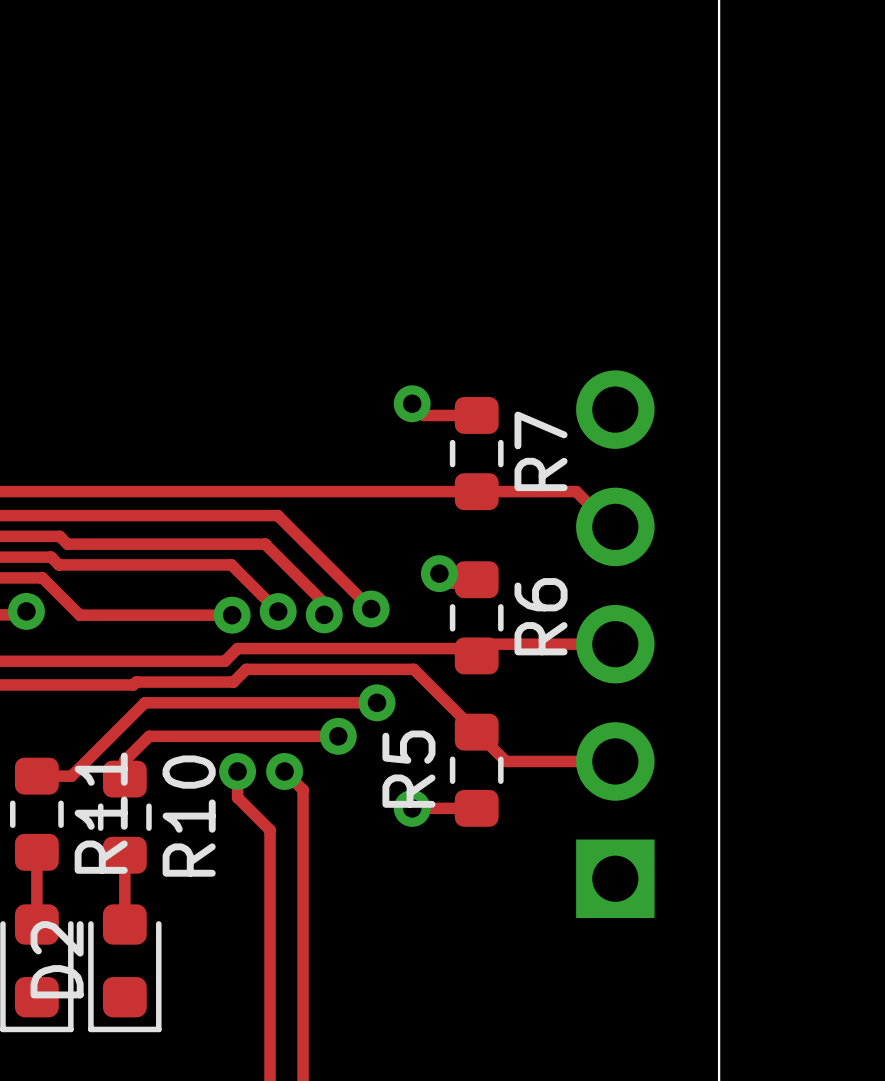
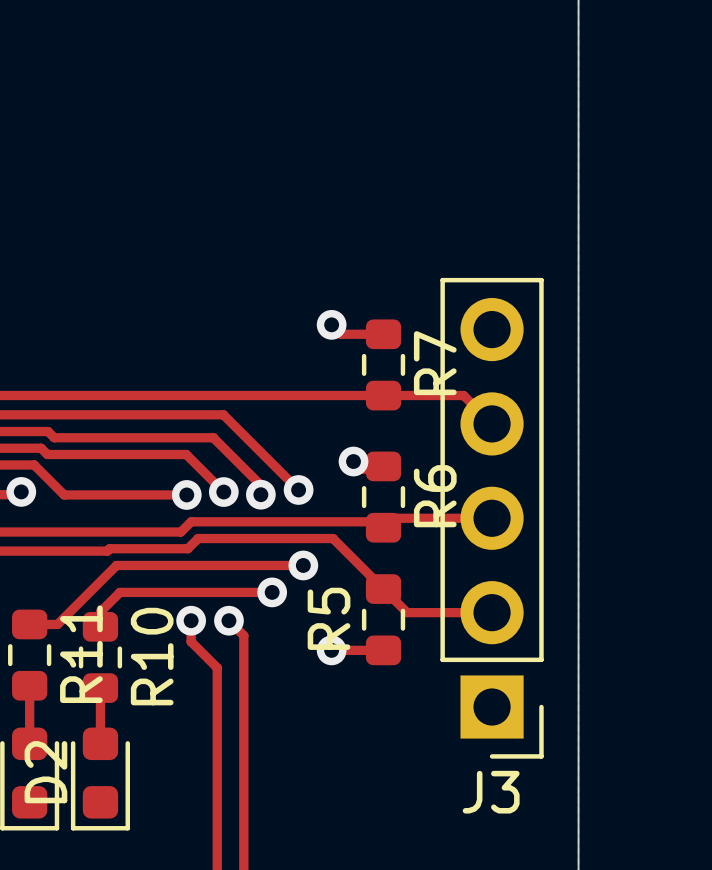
J3 side: bottom (615, 644) -> top (492, 518)

